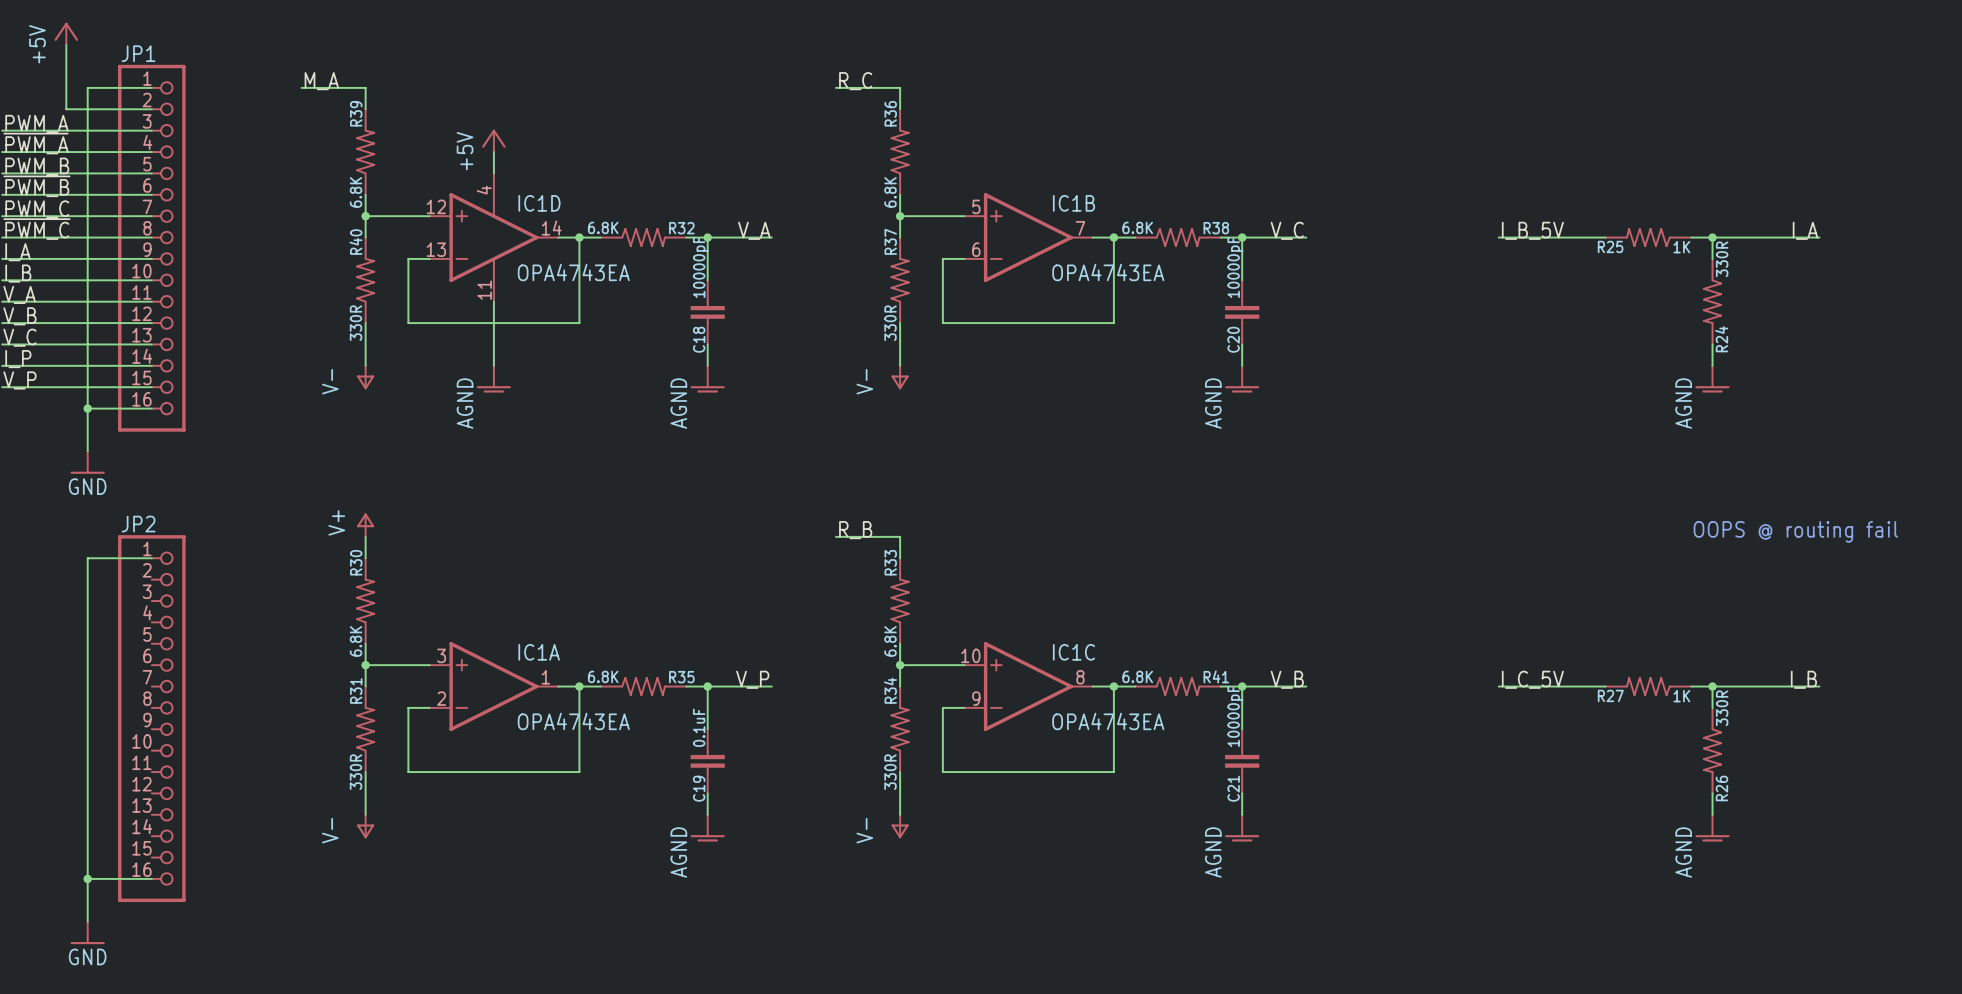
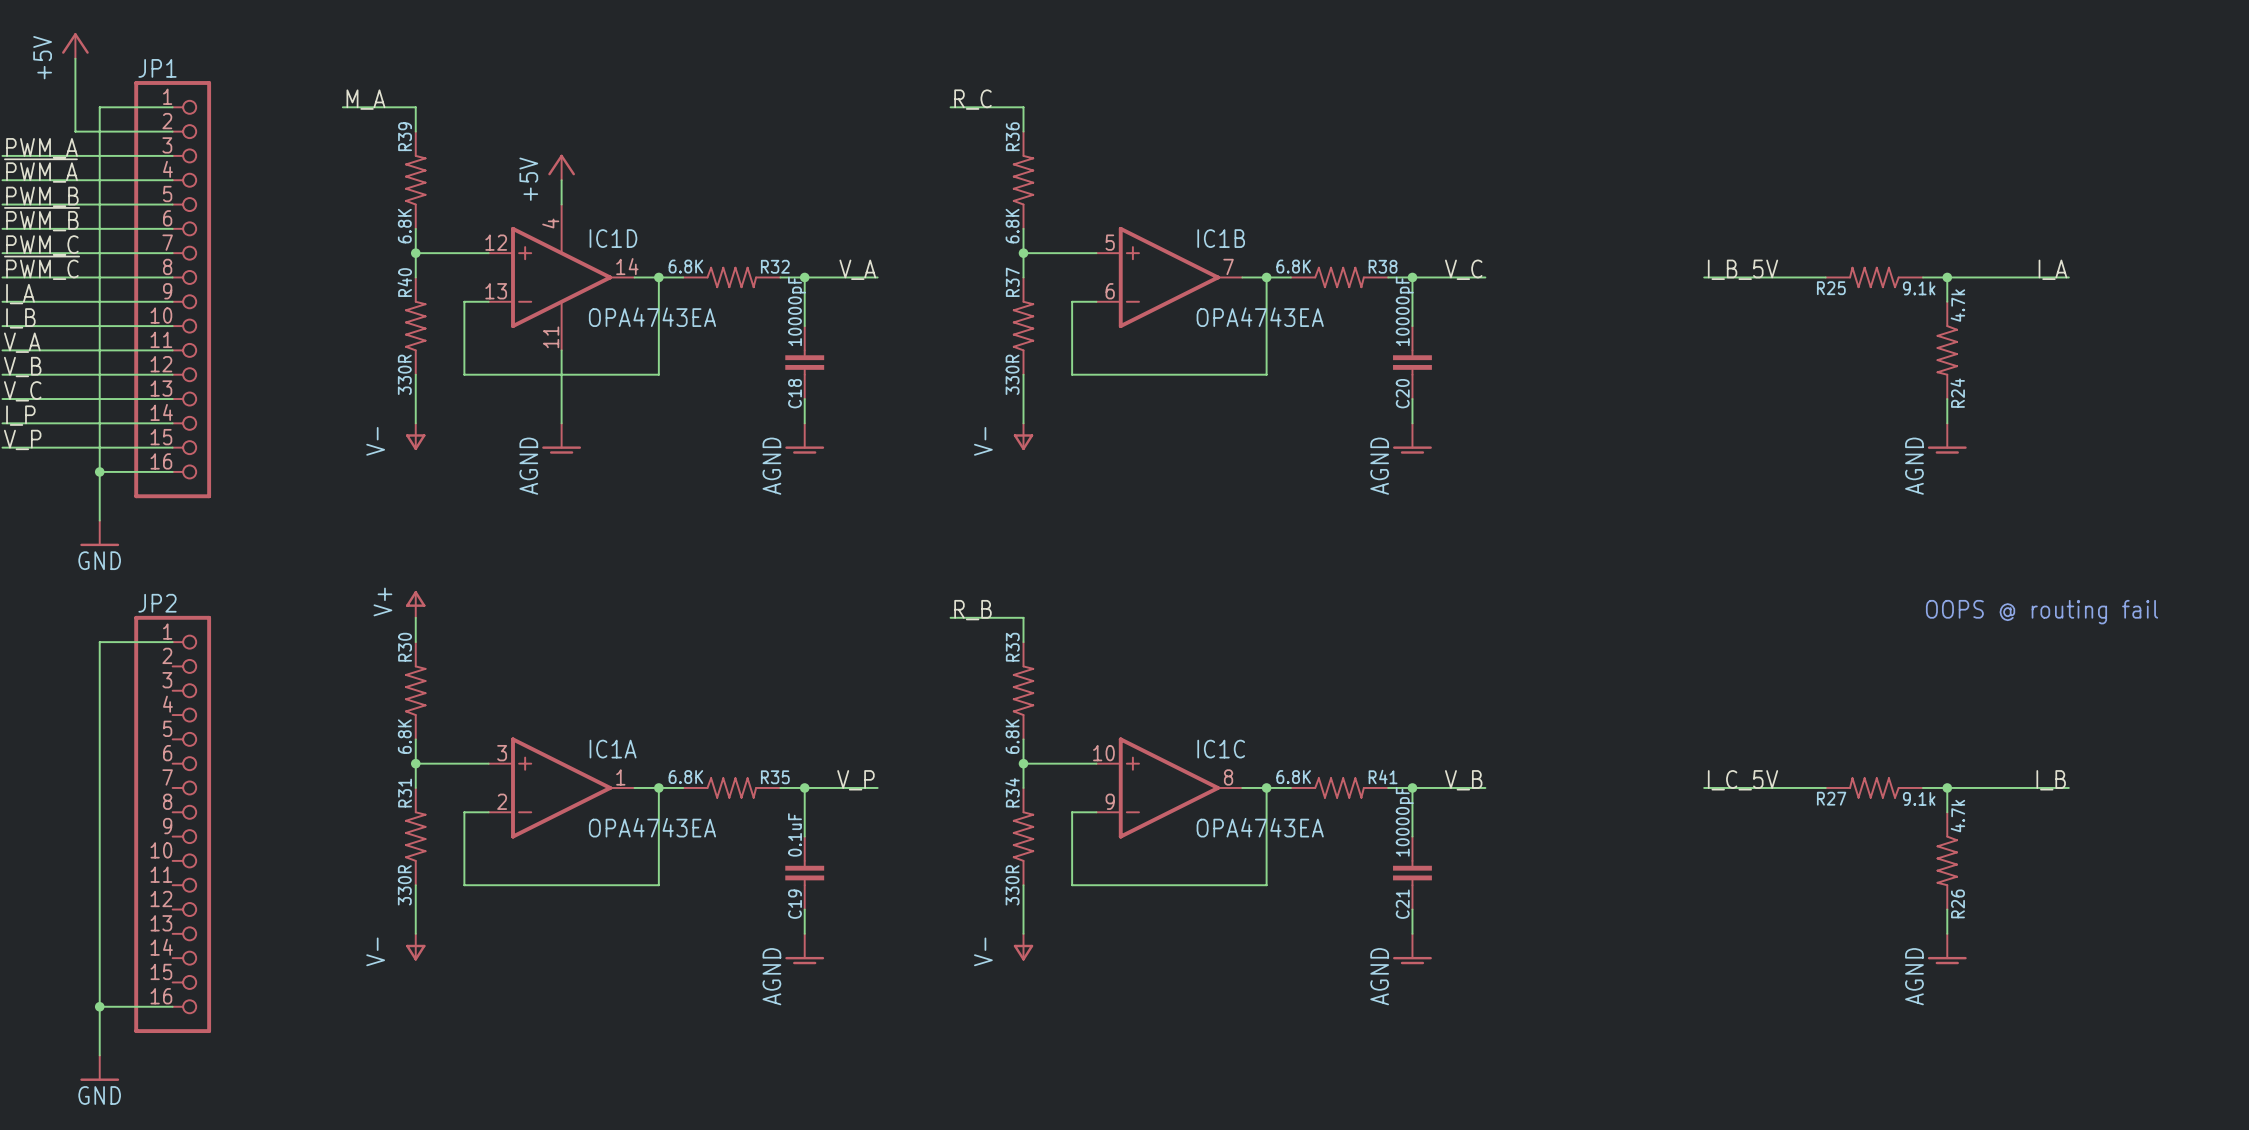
R25 value: 1K (1681, 247) -> 9.1k (1919, 288)
R24 value: 330R (1722, 259) -> 4.7k (1957, 305)
R27 value: 1K (1681, 696) -> 9.1k (1919, 798)
R26 value: 330R (1722, 708) -> 4.7k (1957, 816)

